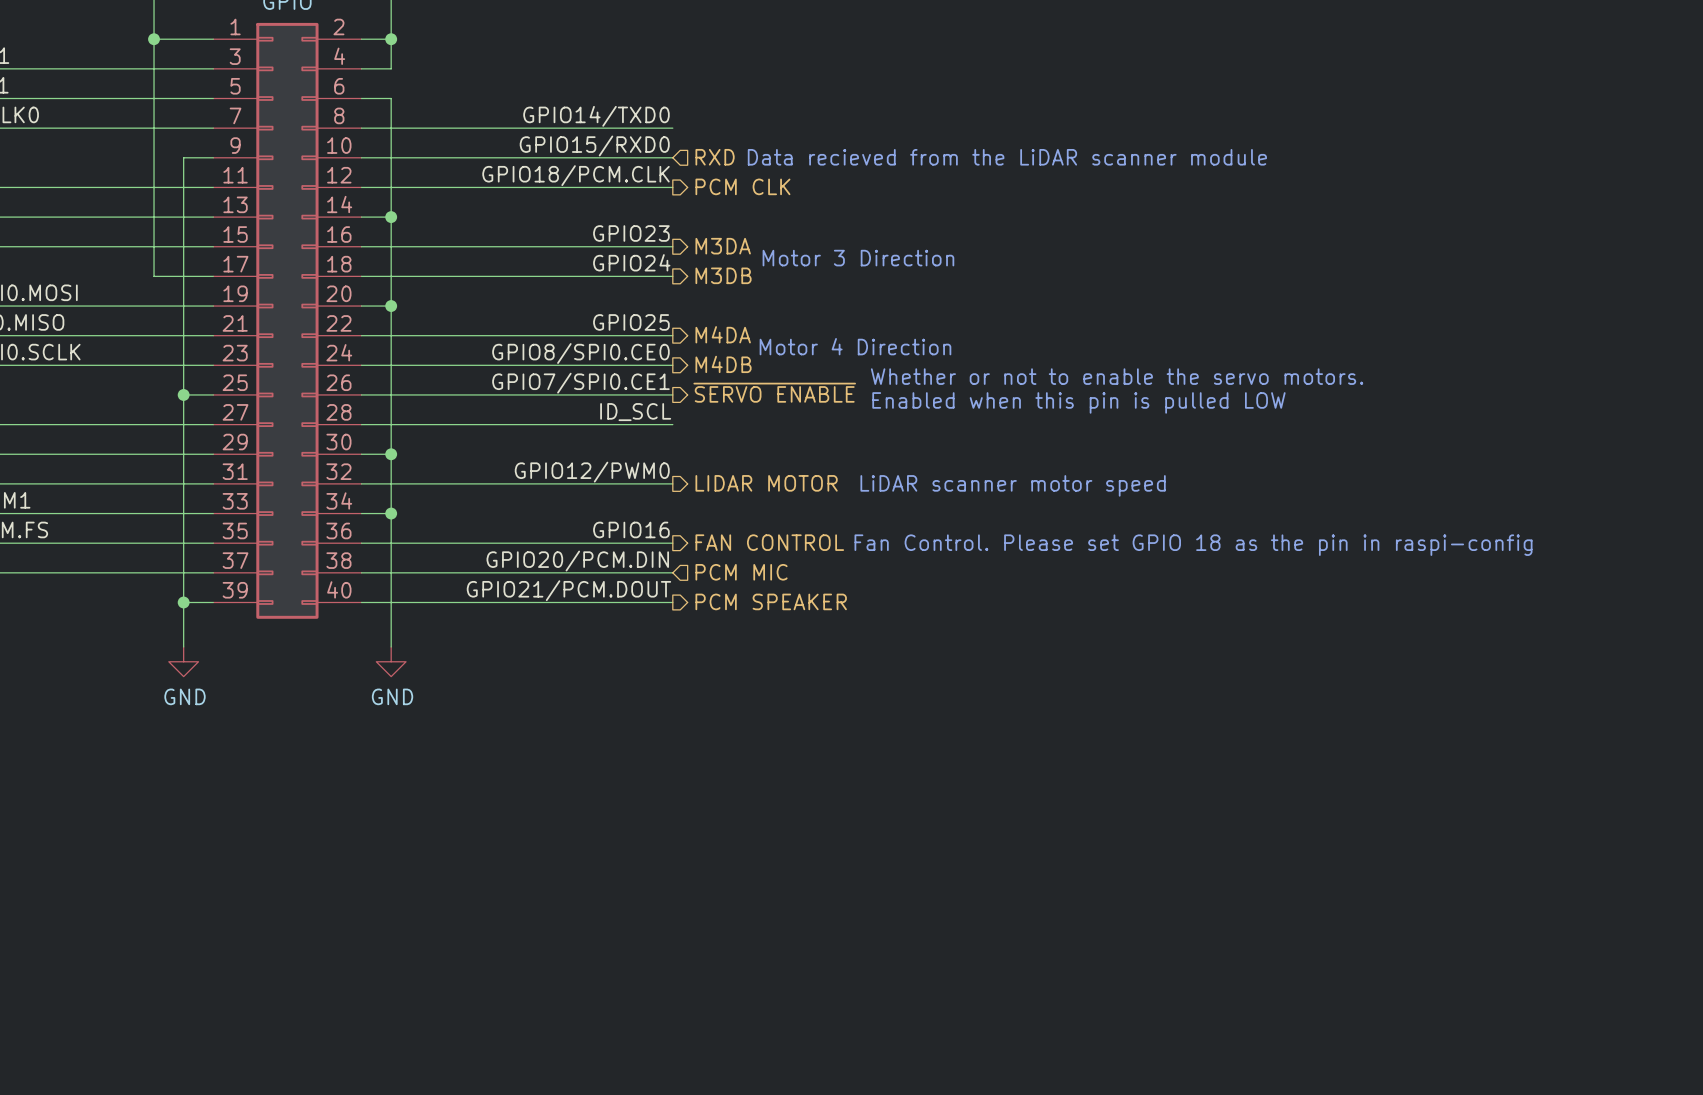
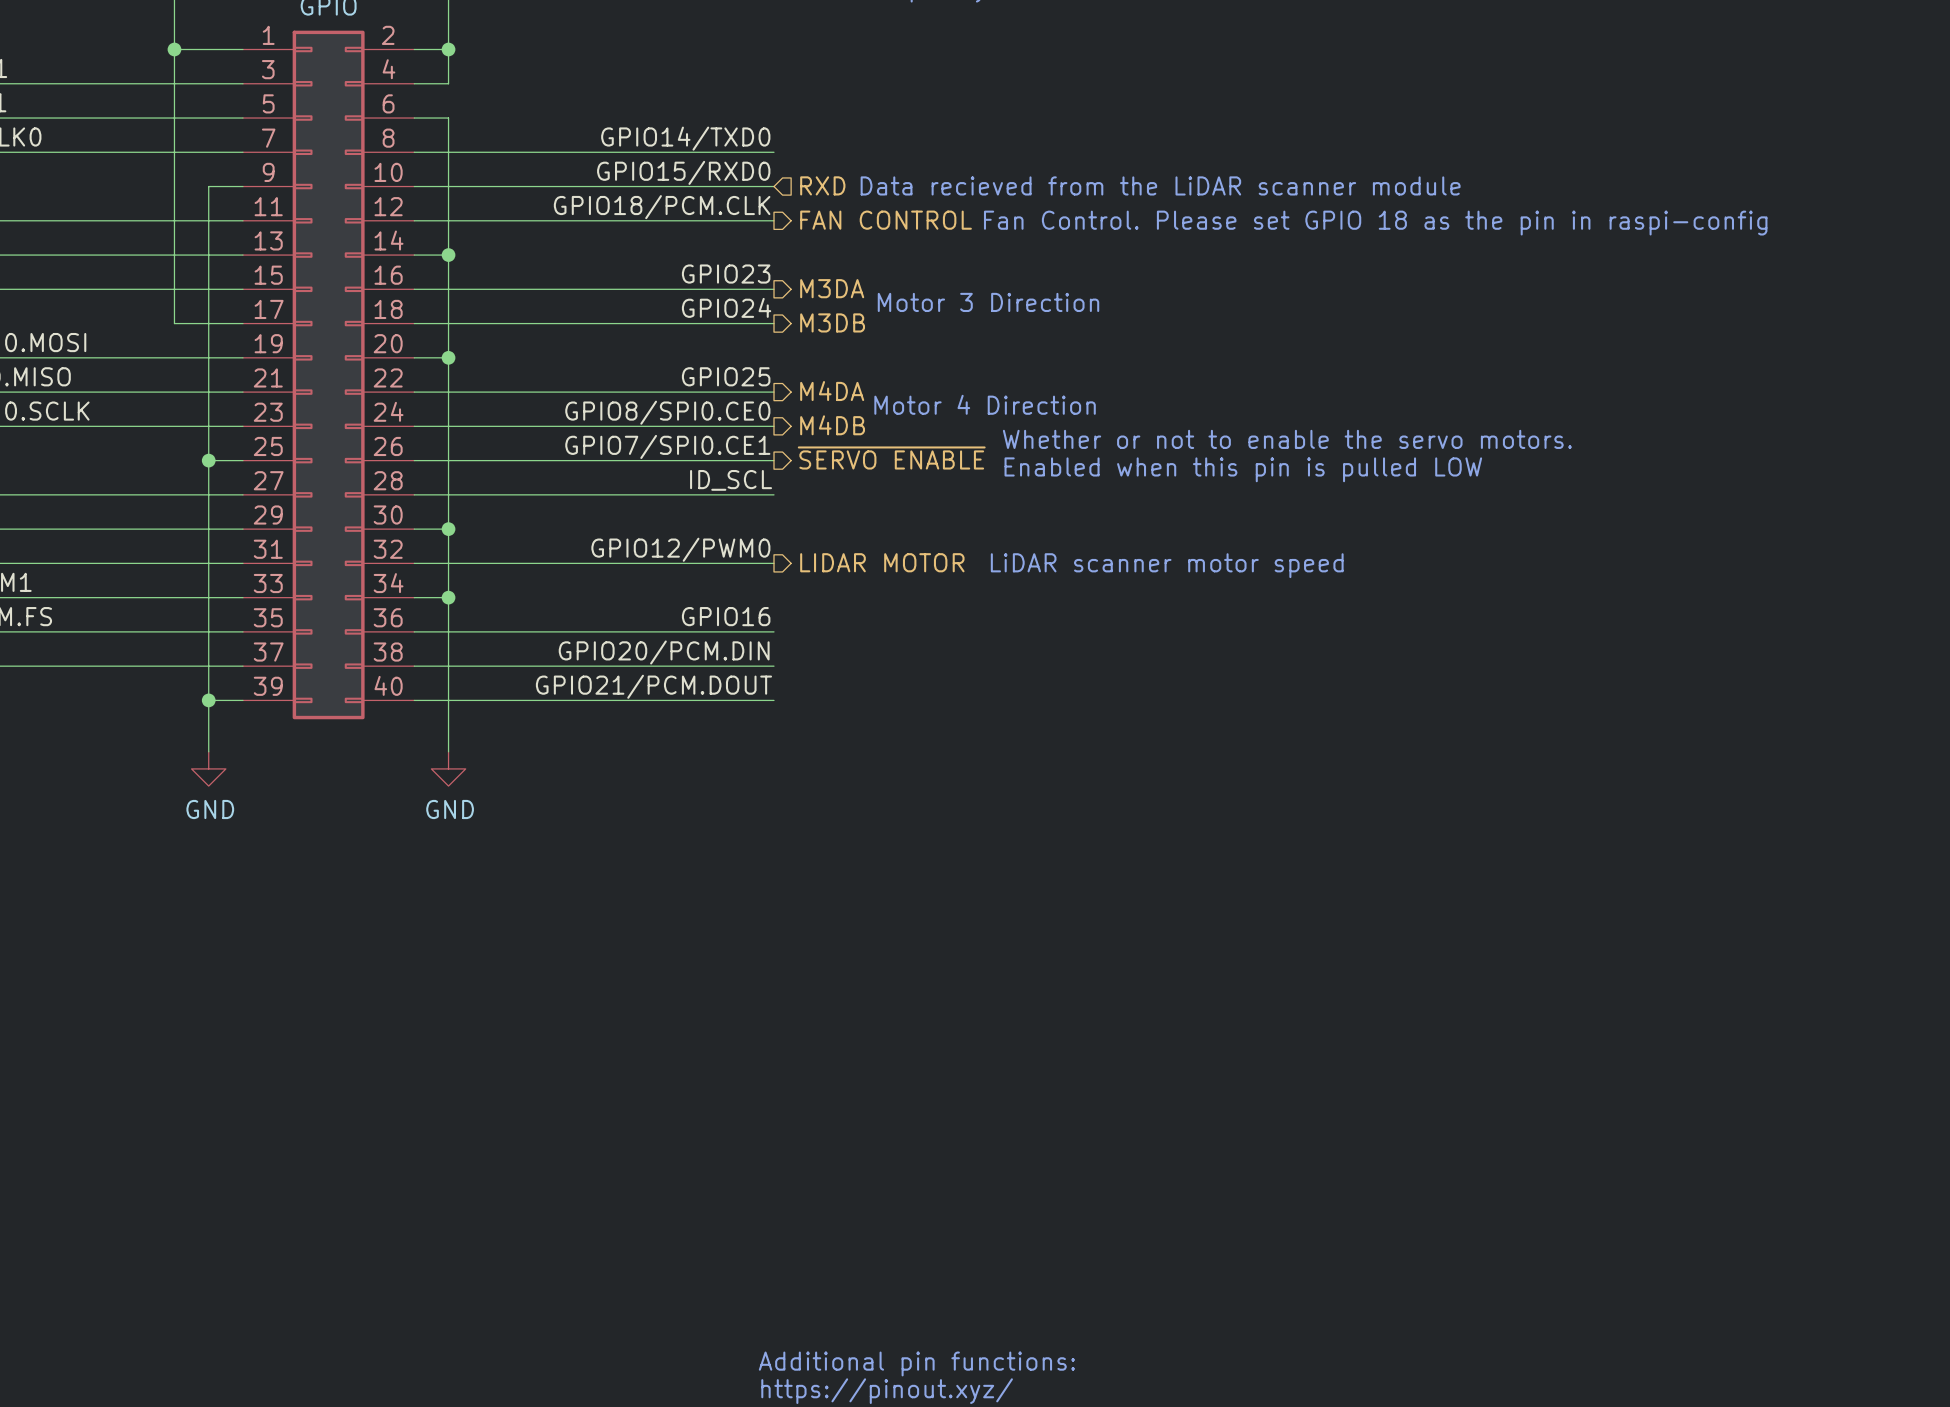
hierarchical label: PCM CLK (742, 186) -> FAN CONTROL (886, 220)
text: none -> Fan Control. Please set GPIO 18 as the pin in raspi-config (1375, 223)
hierarchical label: FAN CONTROL (769, 542) -> none
text: Fan Control. Please set GPIO 18 as the pin in raspi-config (1193, 545) -> none
hierarchical label: PCM MIC (741, 572) -> none
hierarchical label: PCM SPEAKER (771, 601) -> none

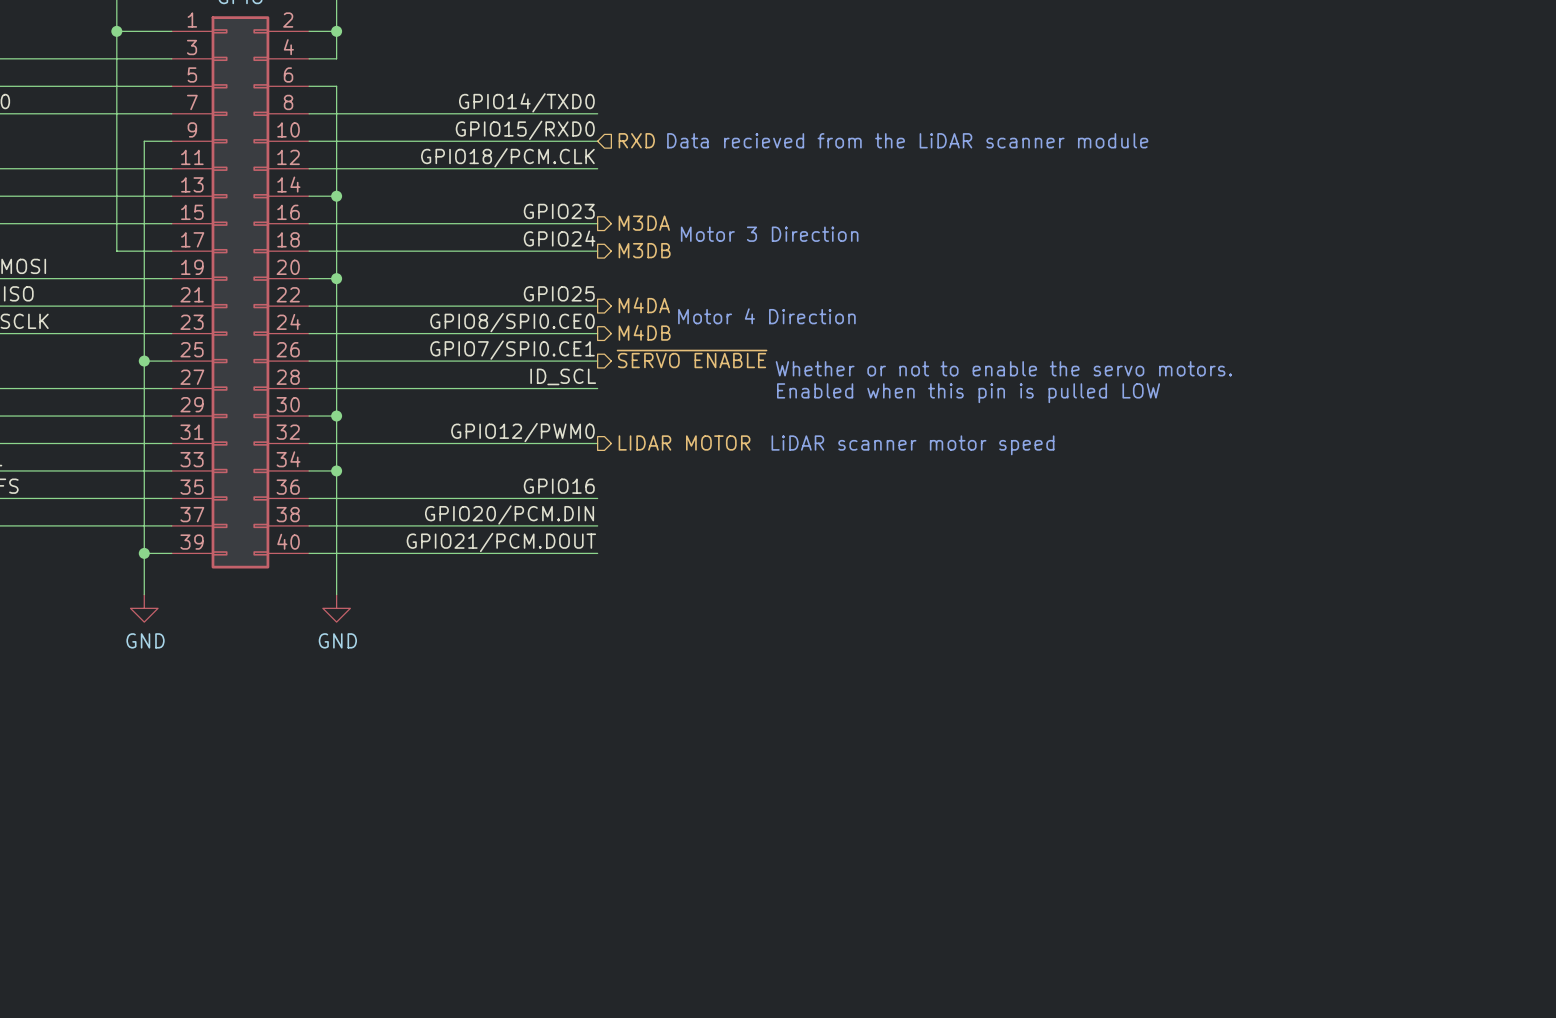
hierarchical label: FAN CONTROL (886, 220) -> none
text: Fan Control. Please set GPIO 18 as the pin in raspi-config (1375, 223) -> none
text: Whether or not to enable the servo motors. (1287, 439) -> none
text: Enabled when this pin is pulled LOW (1243, 469) -> Whether or not to enable the servo motors. (1003, 368)
text: none -> Enabled when this pin is pulled LOW (968, 393)

